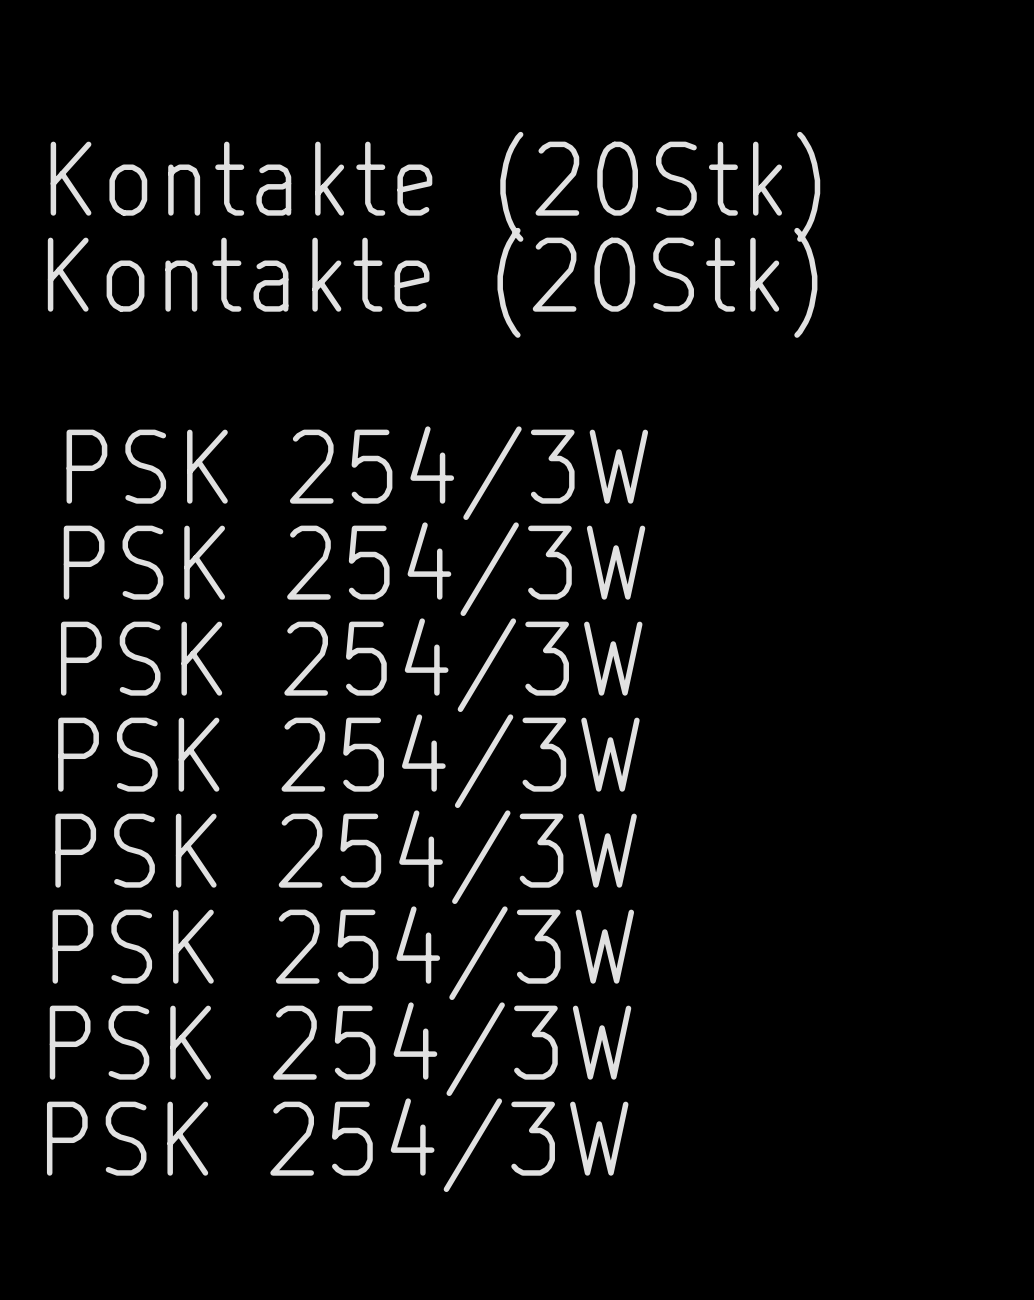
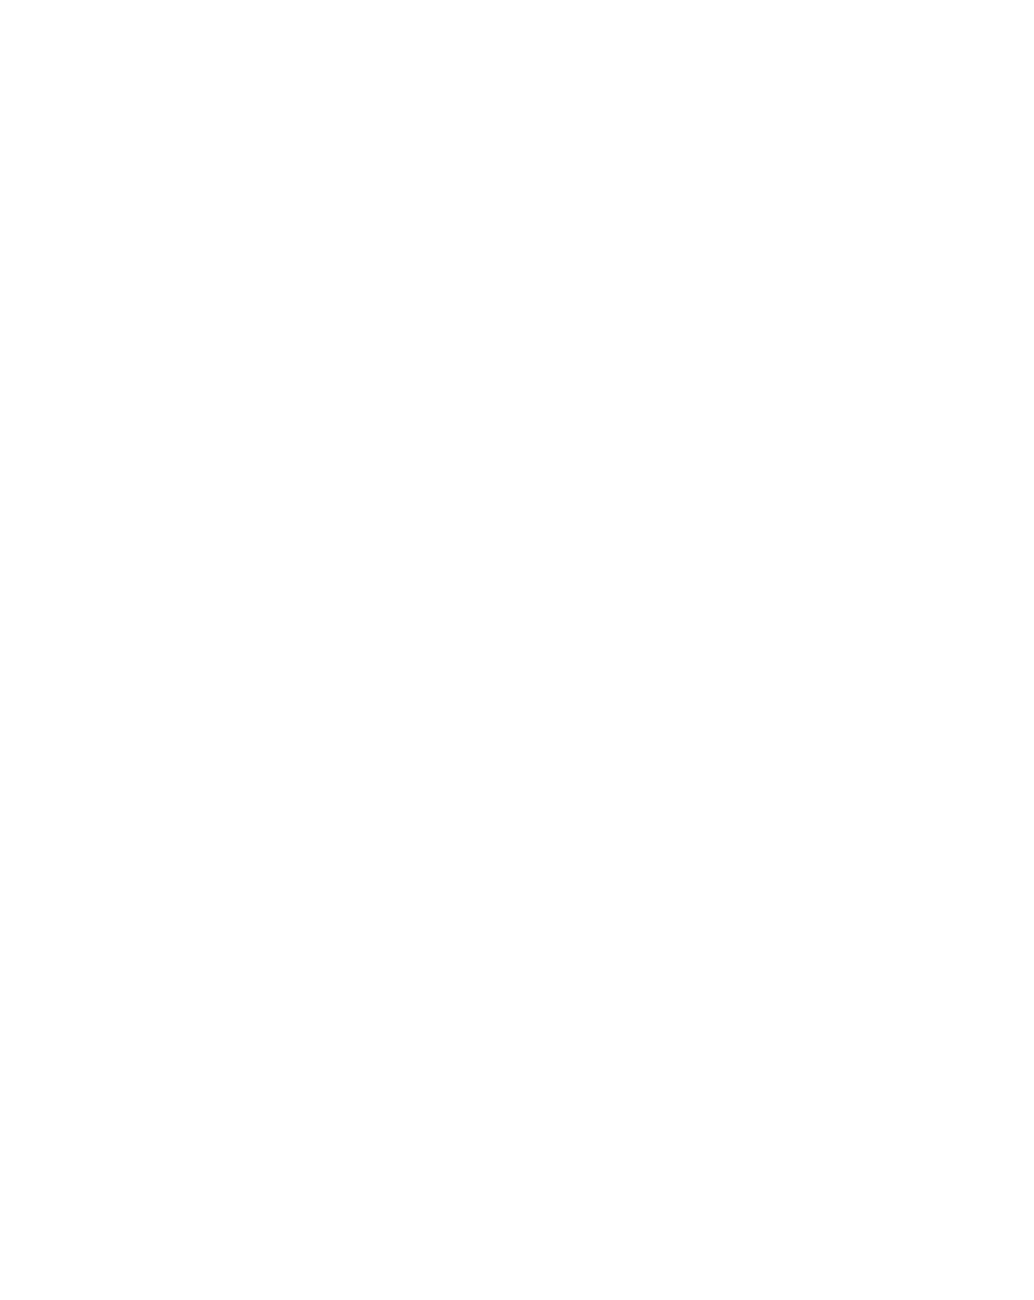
drawing: [46, 131, 821, 1193] -> none

